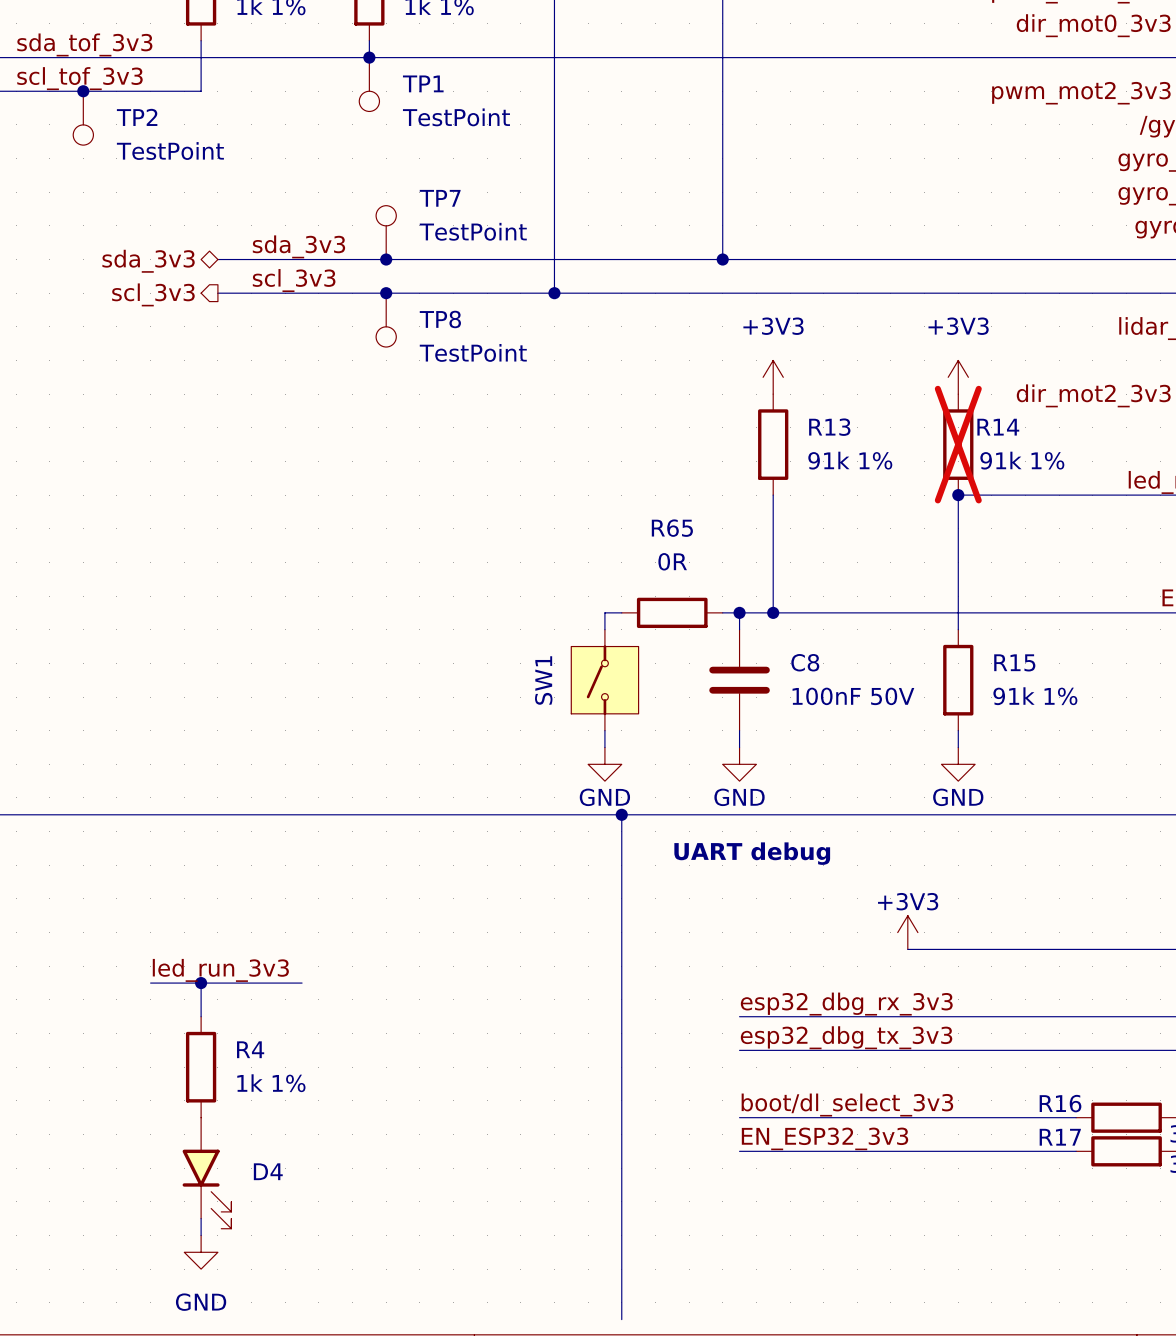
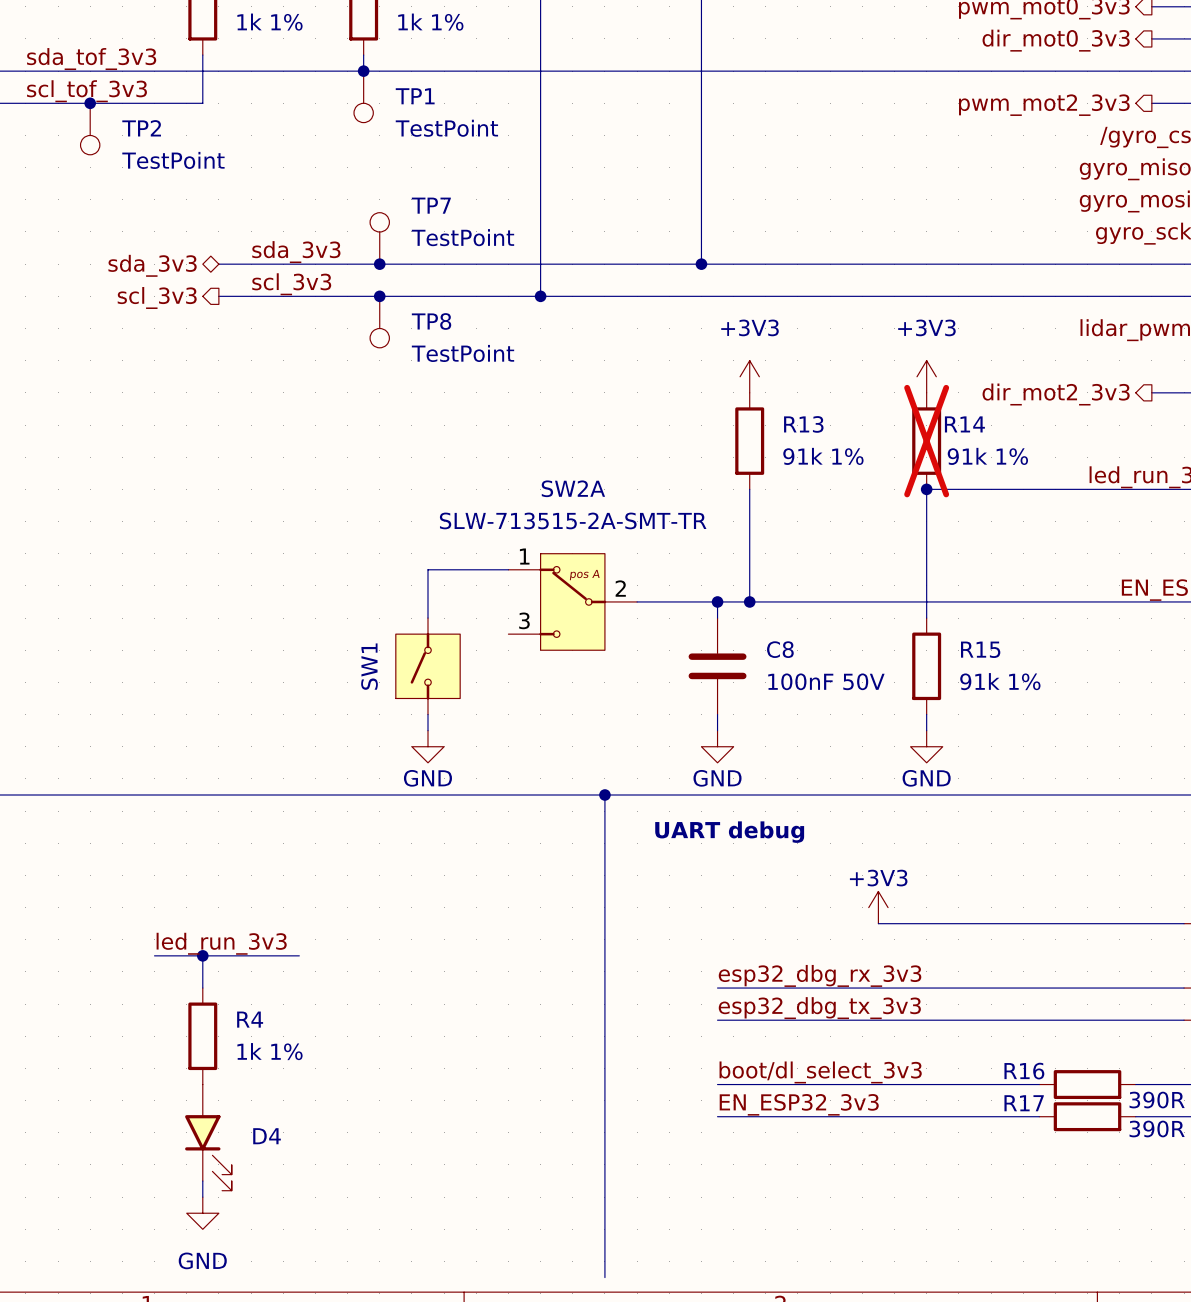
wire: none -> (508, 569) (427, 569) (427, 618)
SW2A: none -> SLW-713515-2A-SMT-TR (572, 601)
wire: none -> (637, 601) (701, 601)
R65: 0R (672, 612) -> none
SW1 position: (604, 680) -> (427, 666)
wire: (604, 730) (604, 747) -> (427, 714) (427, 730)
power symbol position: GND (604, 764) -> GND (427, 746)

